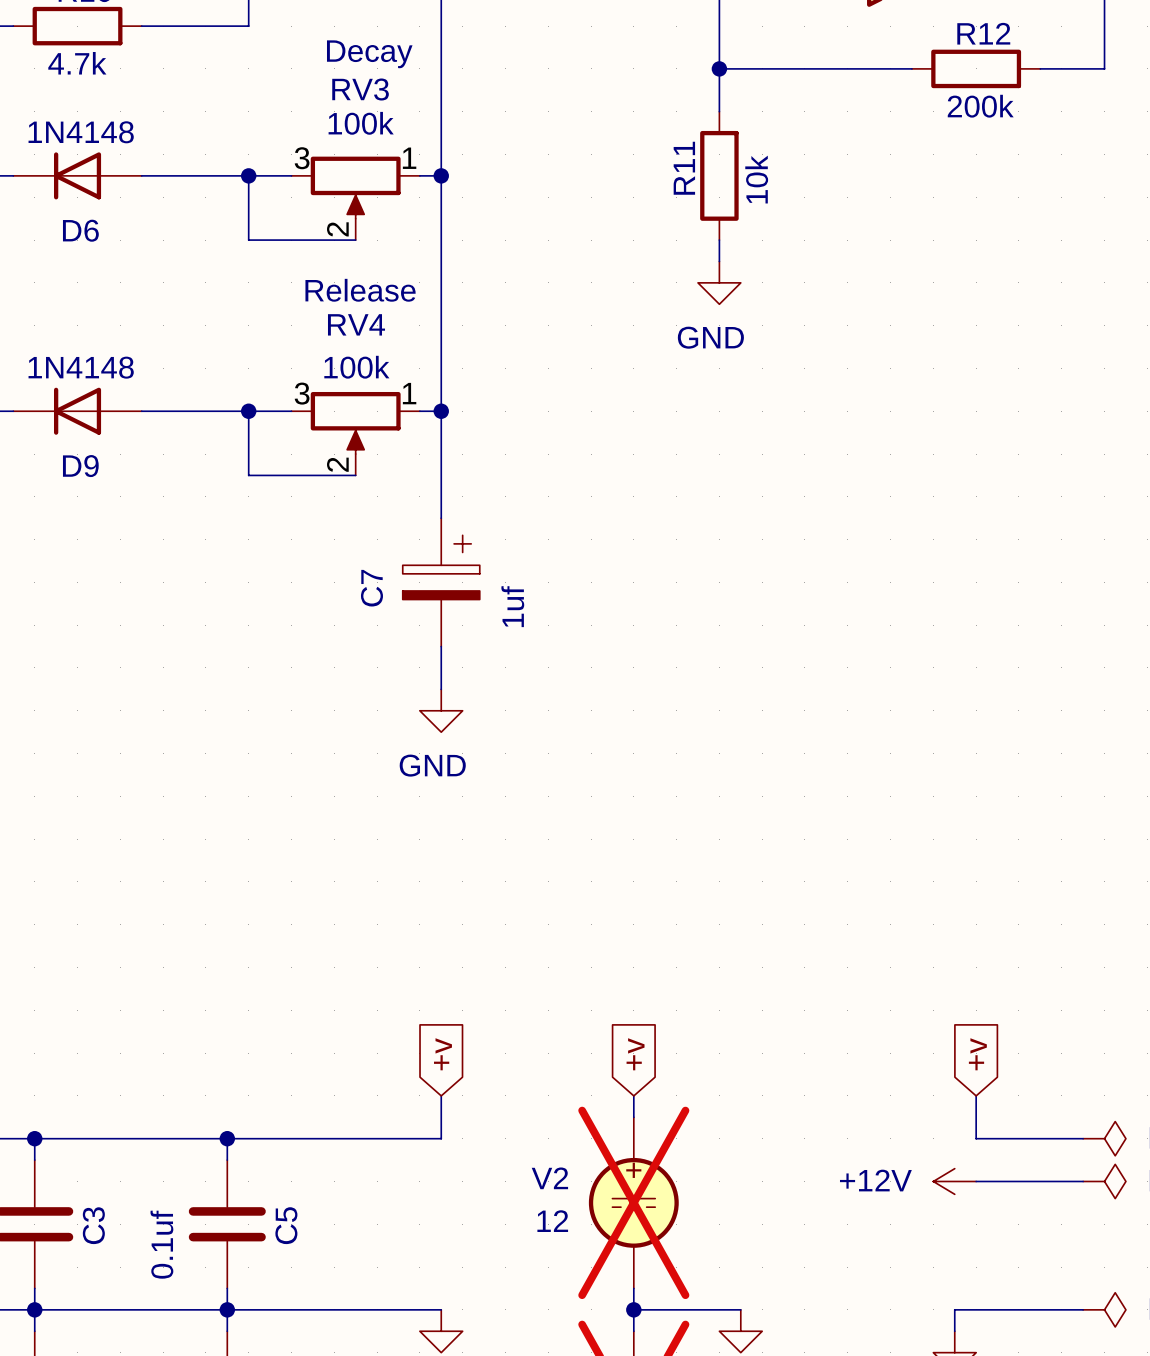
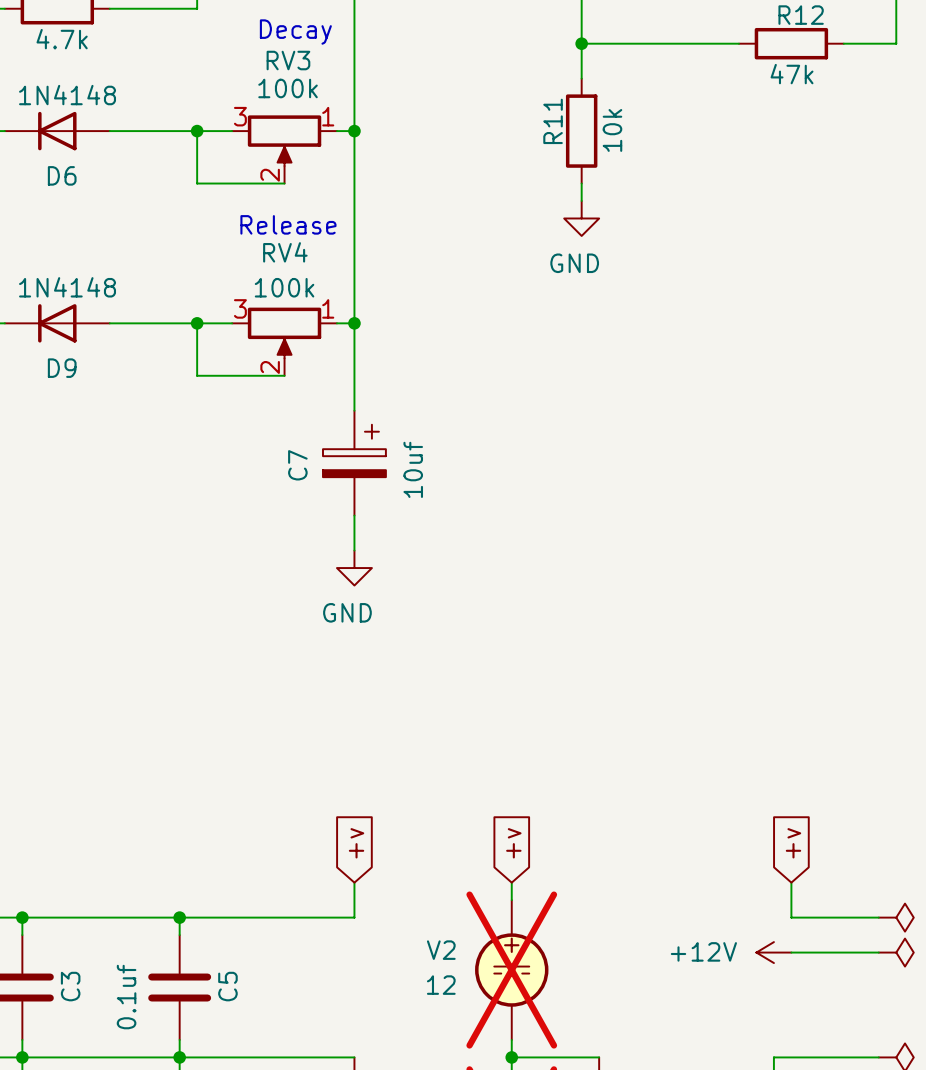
R12 value: 200k (980, 106) -> 47k (792, 74)
C7 value: 1uf (512, 606) -> 10uf (413, 469)

